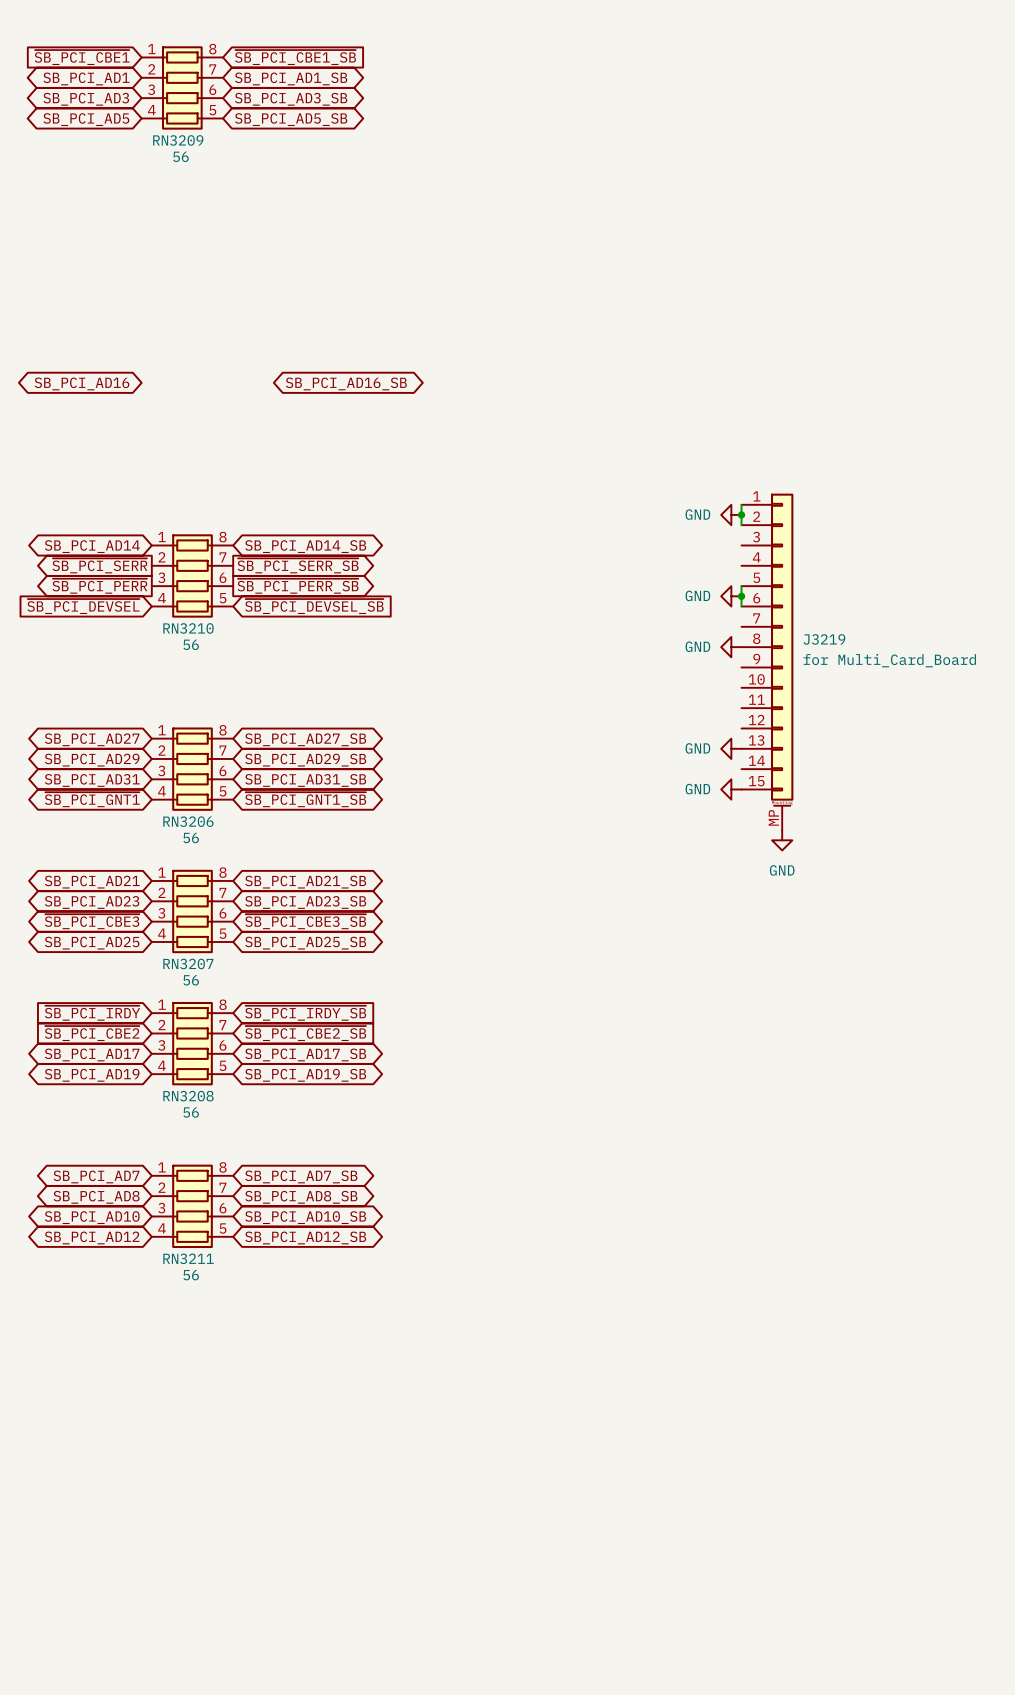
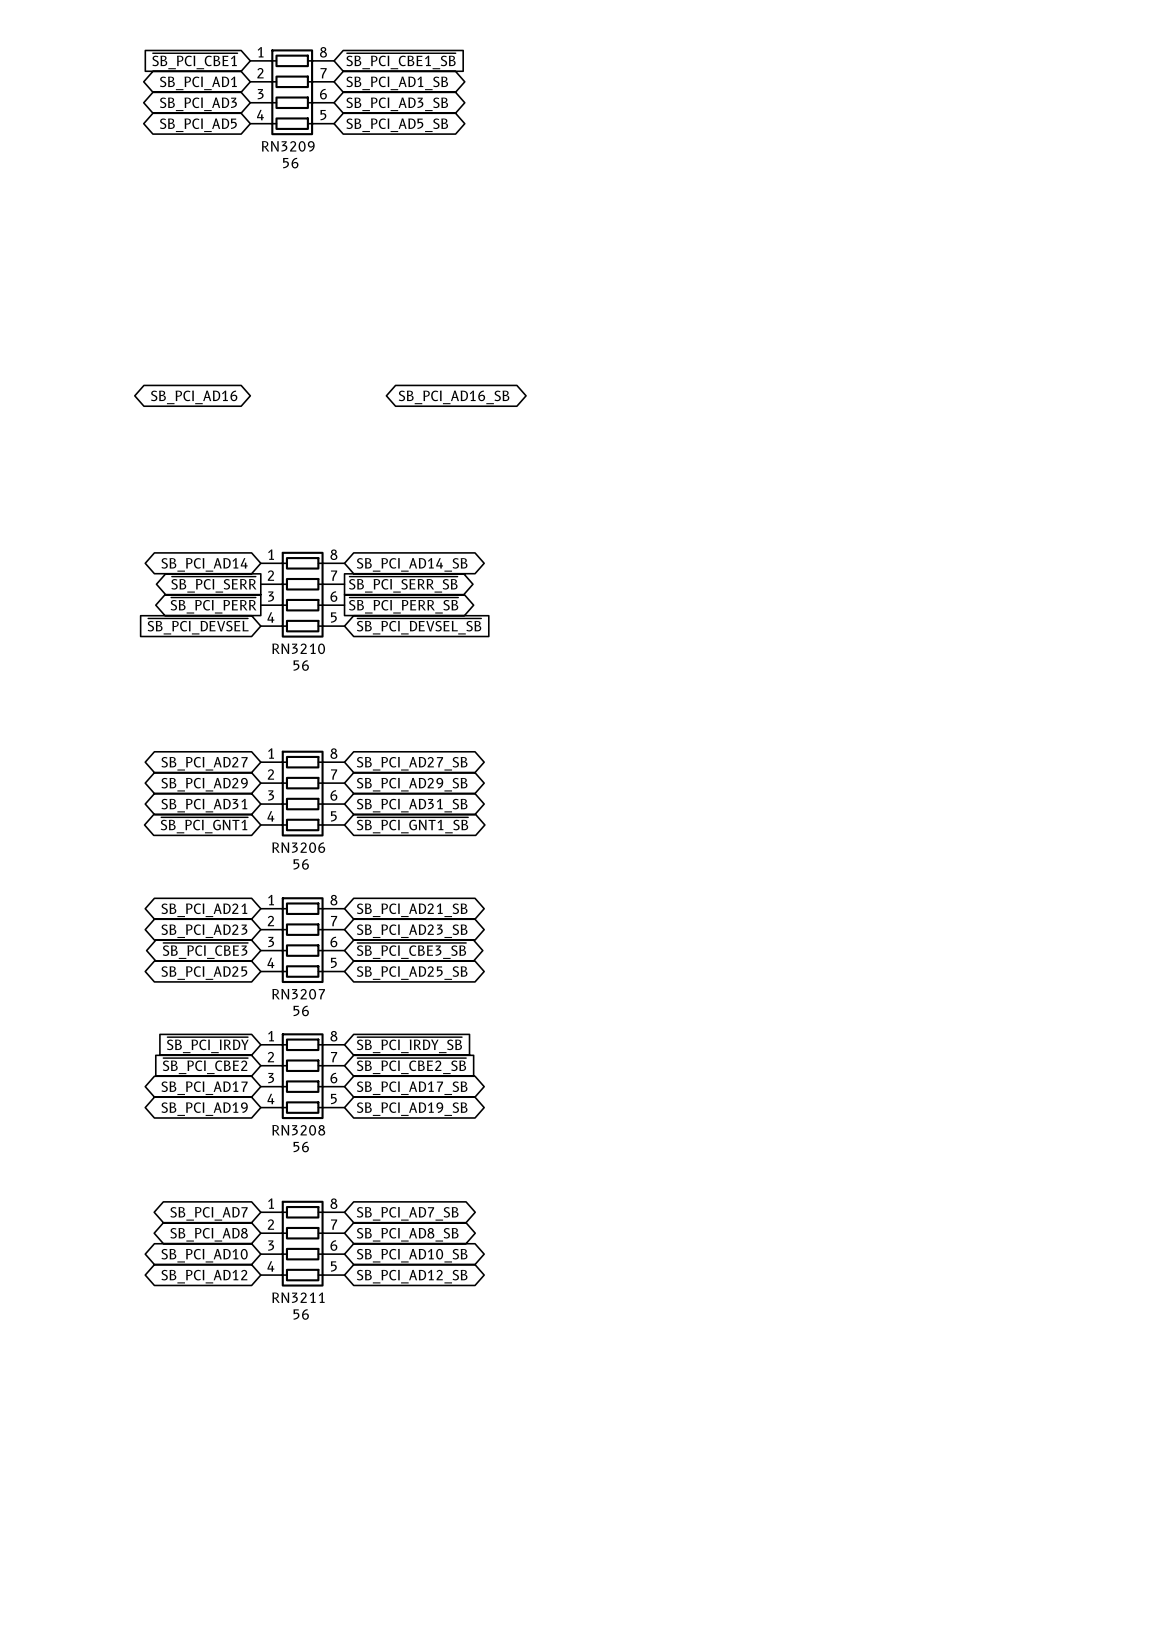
wire: (741, 504) (741, 525) -> none
power symbol: GND (731, 514) -> none
junction: (741, 514) -> none
wire: (741, 586) (741, 606) -> none
power symbol: GND (731, 596) -> none
junction: (741, 596) -> none
power symbol: GND (731, 647) -> none
J3219: for Multi_Card_Board (767, 661) -> none
power symbol: GND (731, 748) -> none
power symbol: GND (731, 789) -> none
power symbol: GND (782, 840) -> none

